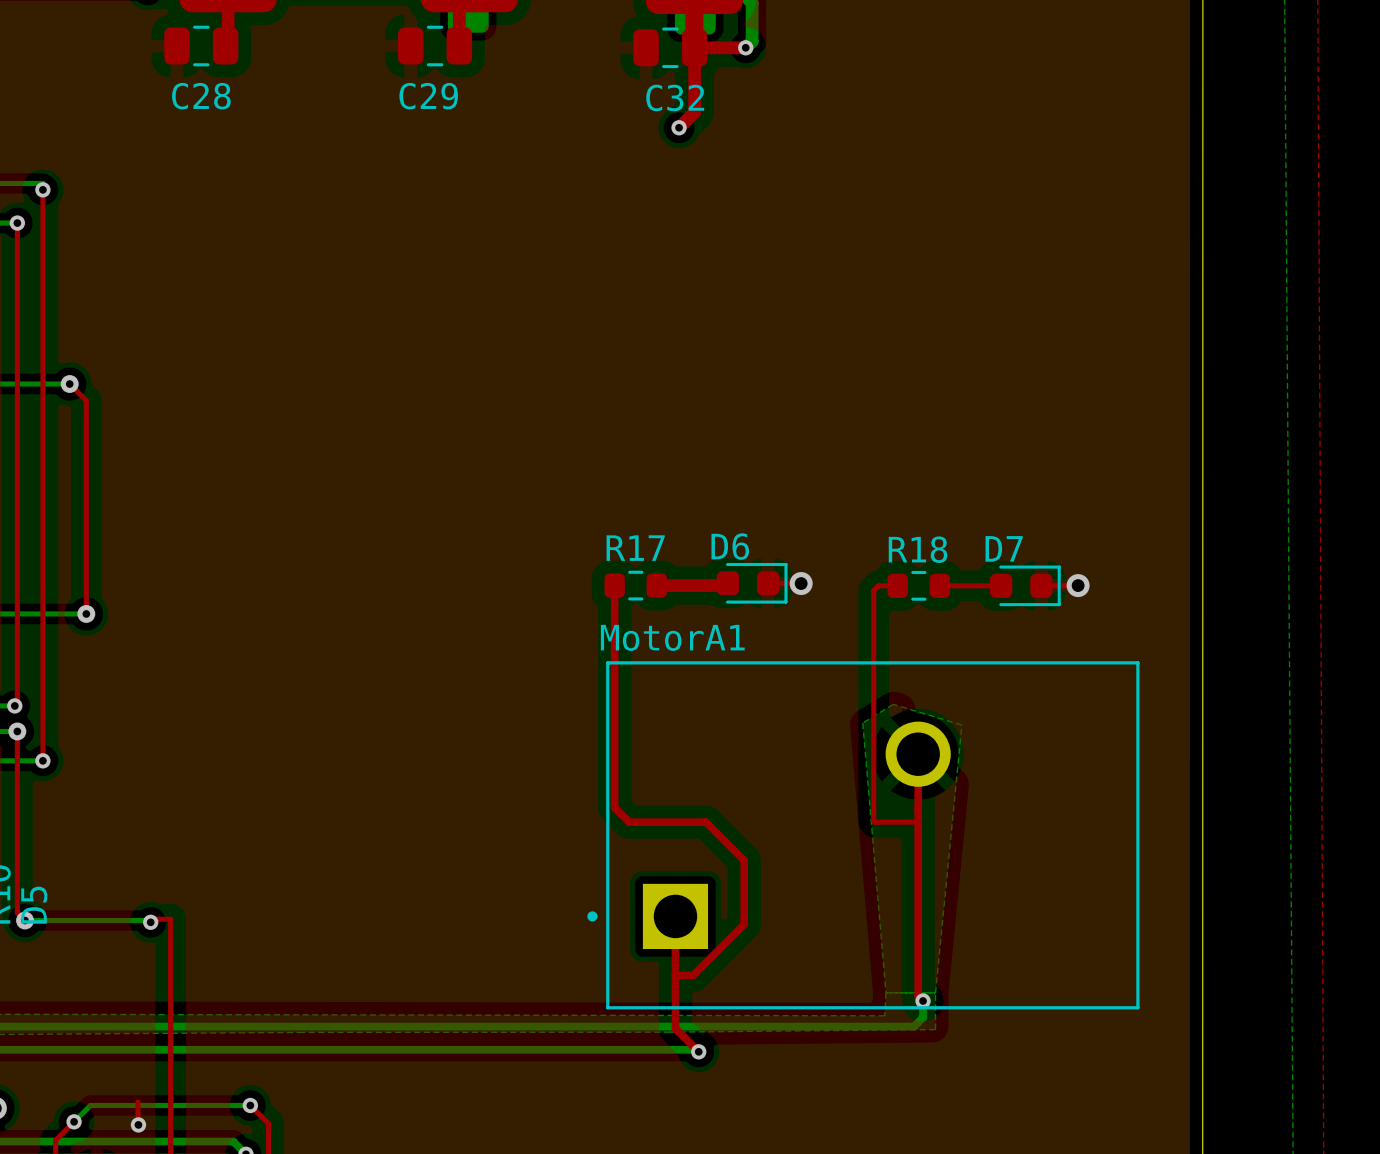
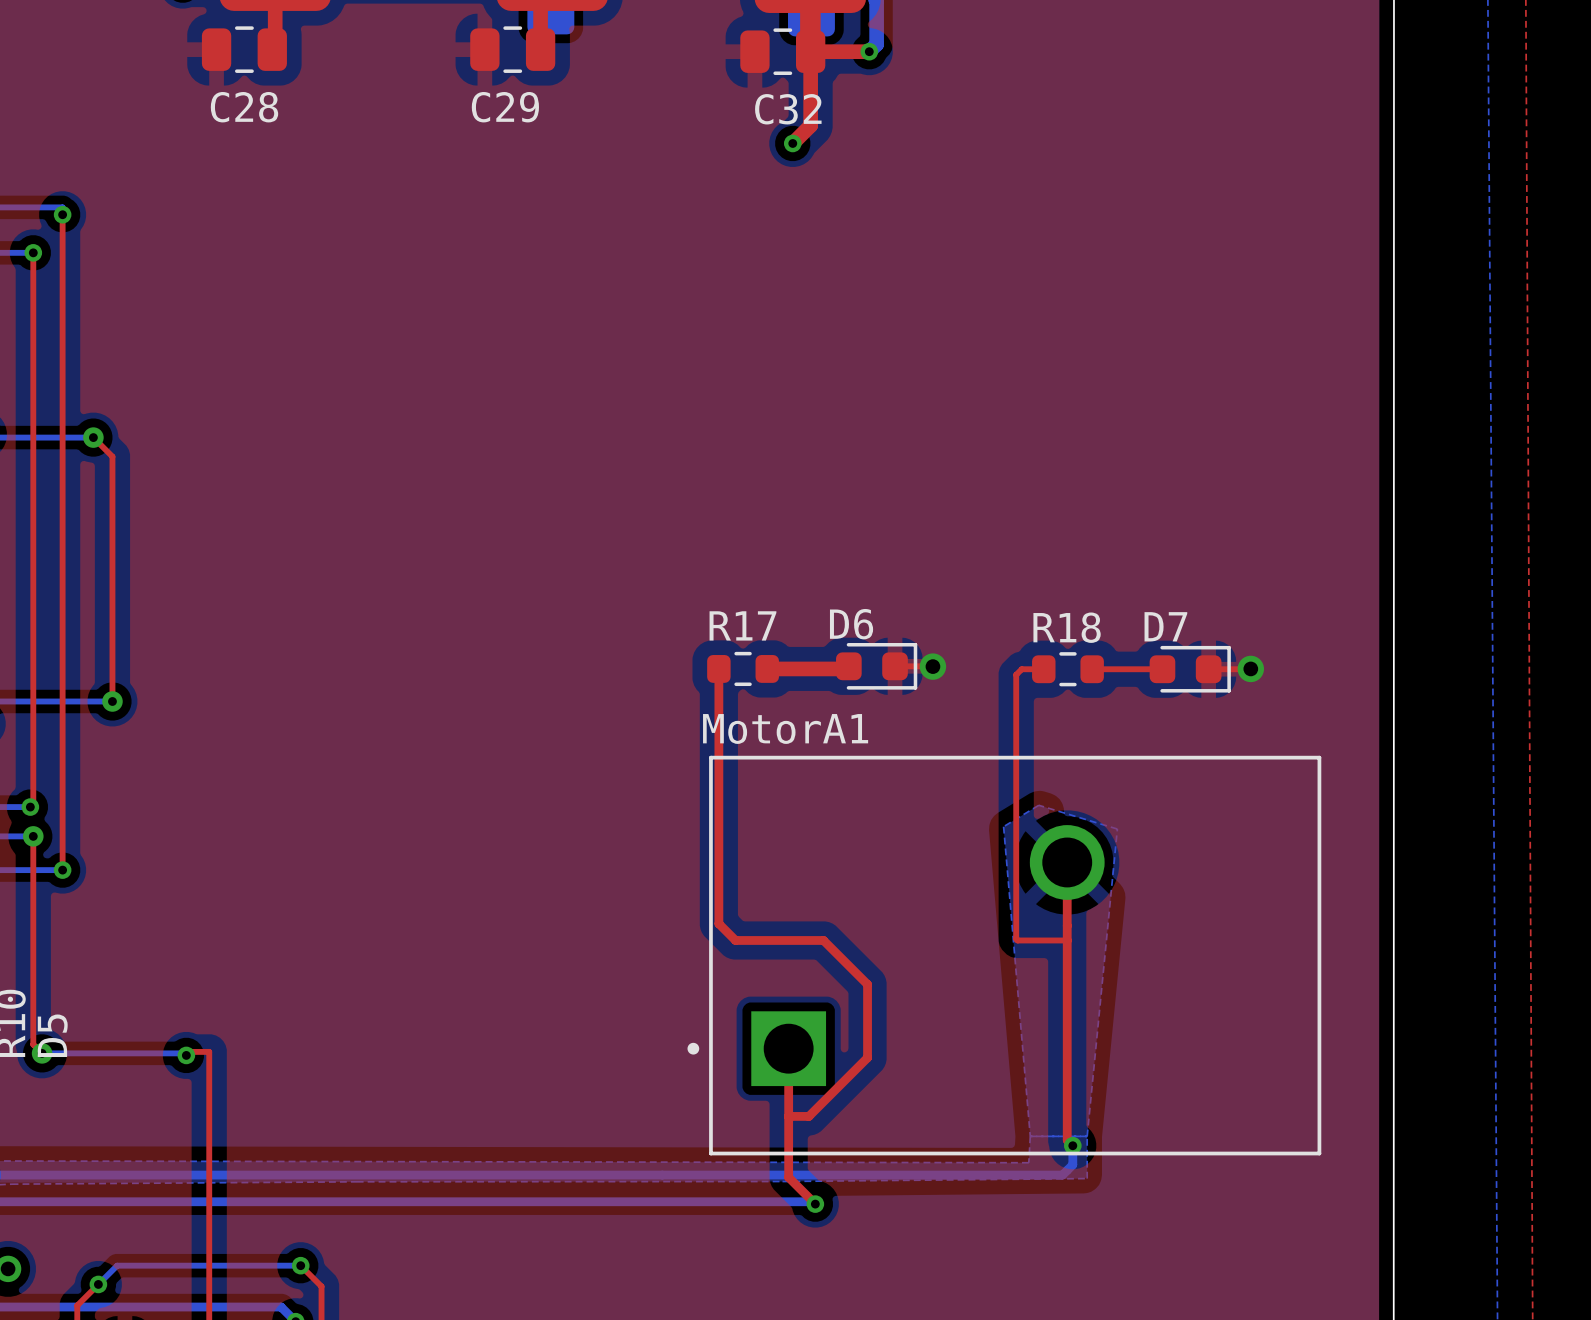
top track: (137, 1102) (138, 1124) -> none
via: (138, 1124) -> none

